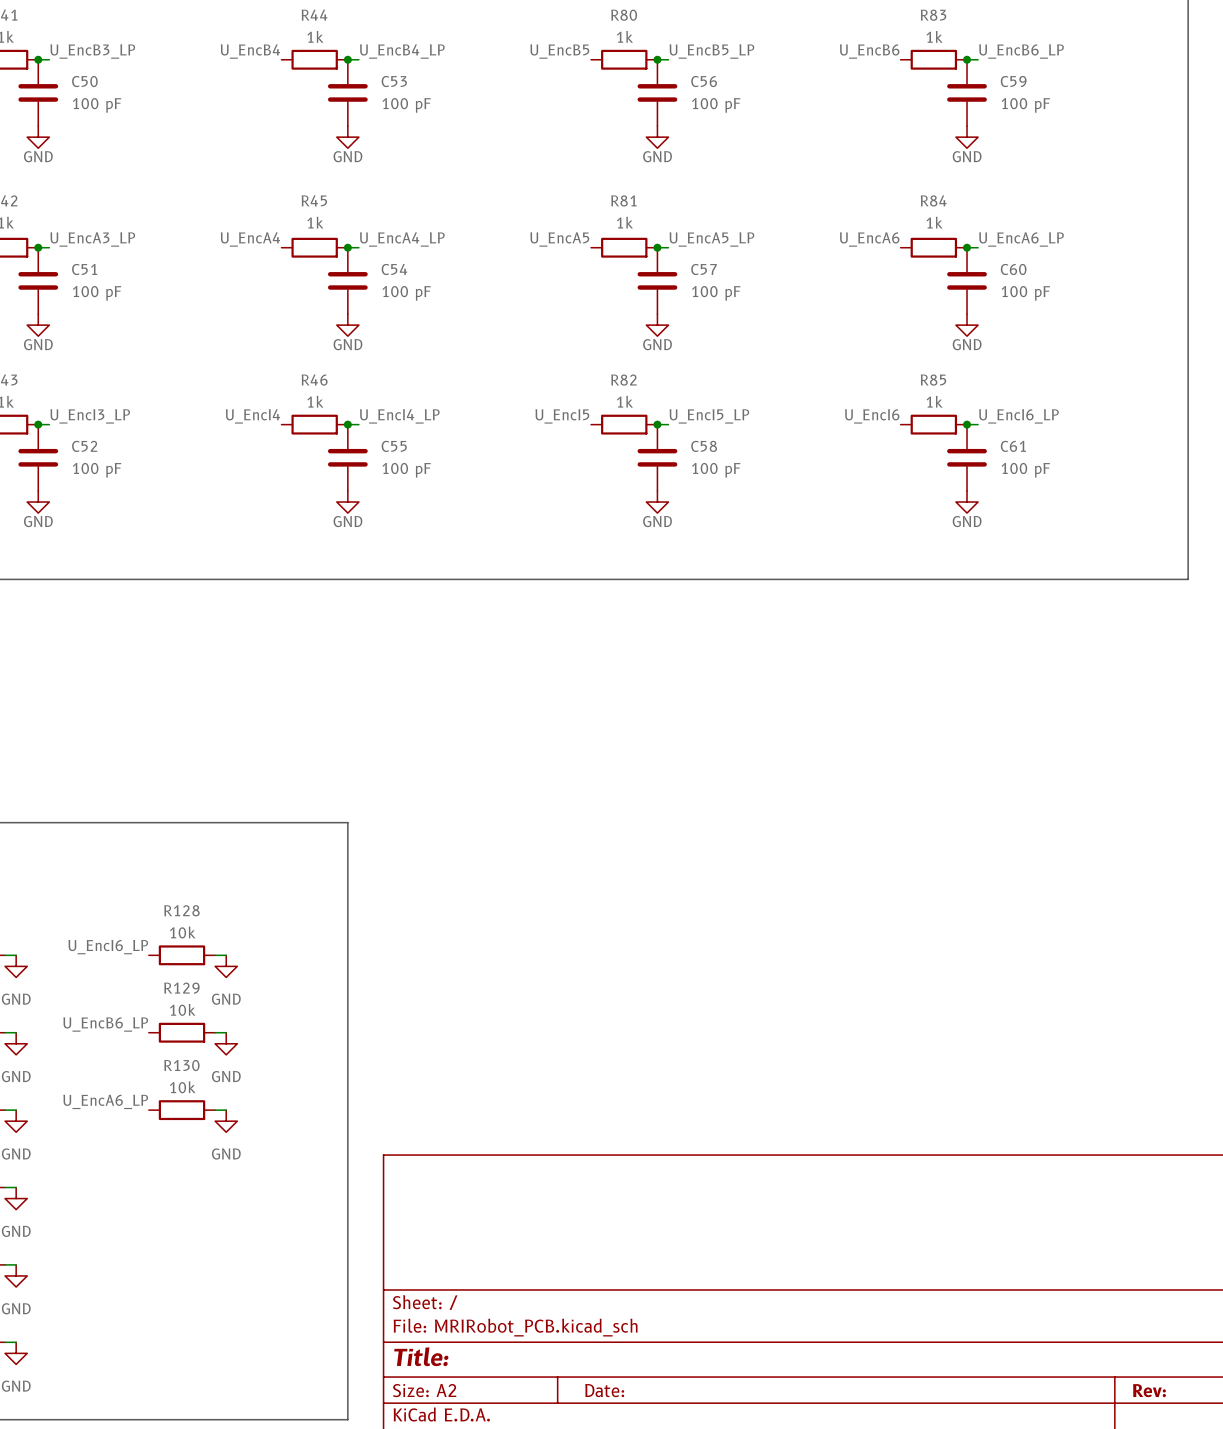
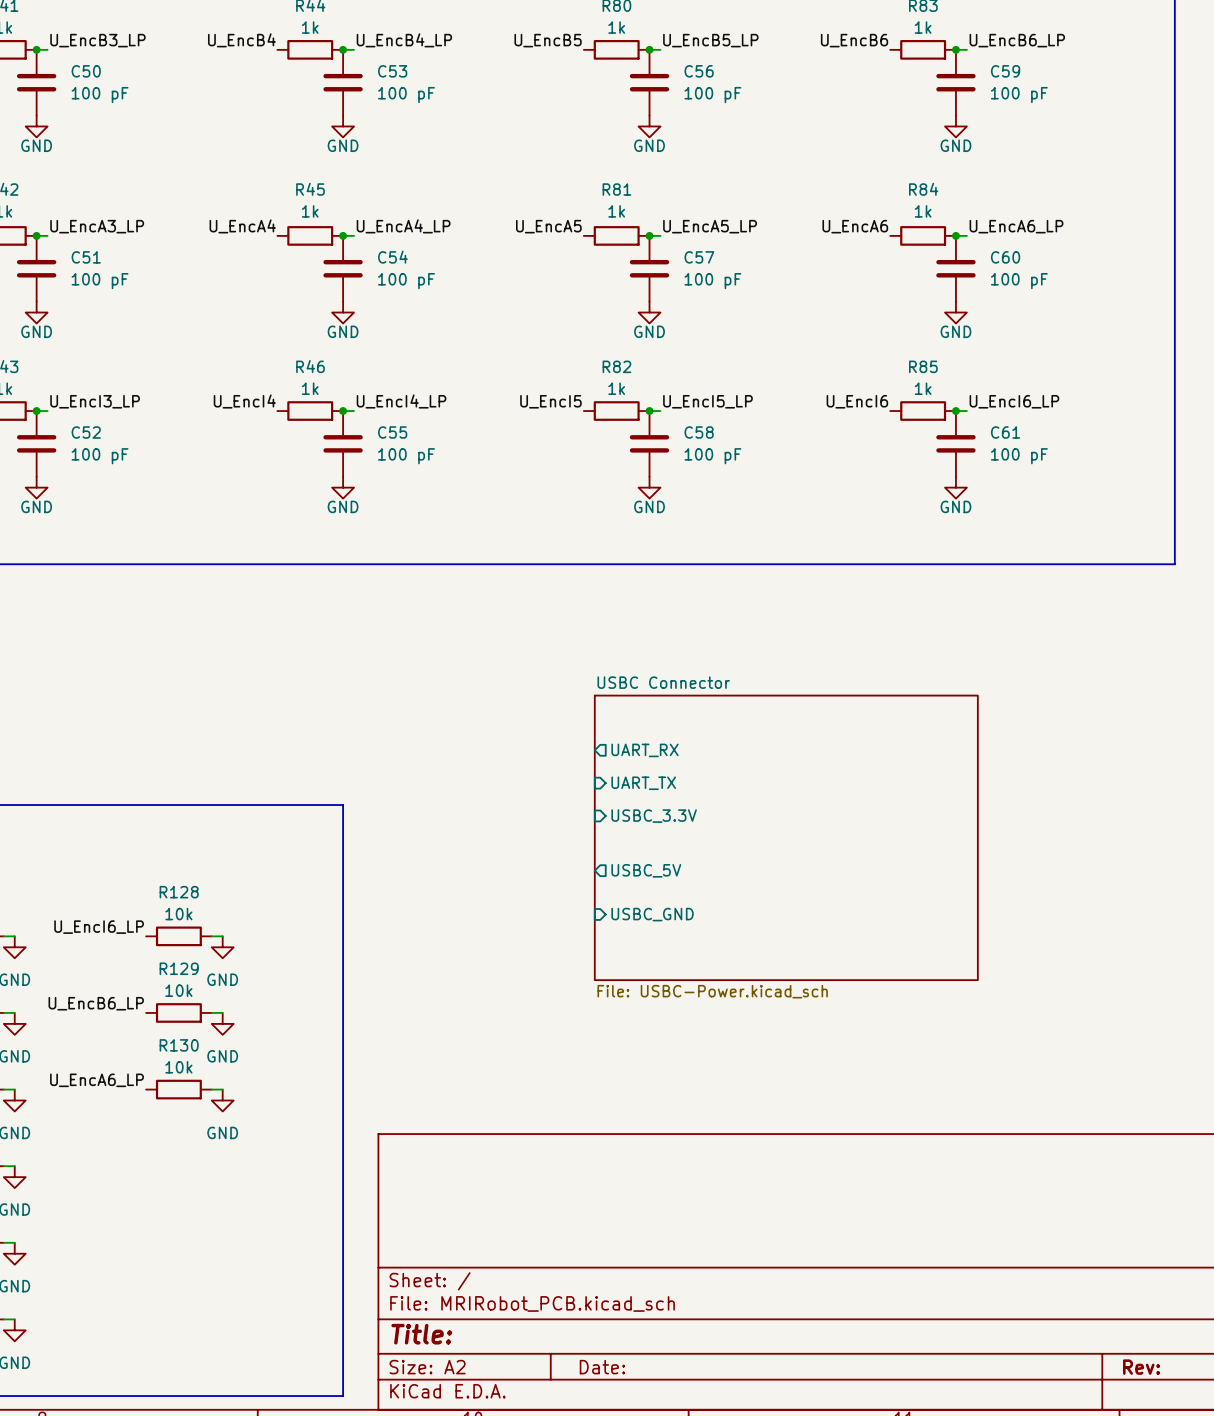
sheet pin: none -> UART_RX (645, 750)
sheet pin: none -> UART_TX (643, 783)
sheet pin: none -> USBC_3.3V (654, 816)
sheet USBC Connector: none -> File: USBC-Power.kicad_sch (786, 837)
sheet pin: none -> USBC_5V (646, 870)
sheet pin: none -> USBC_GND (652, 914)

